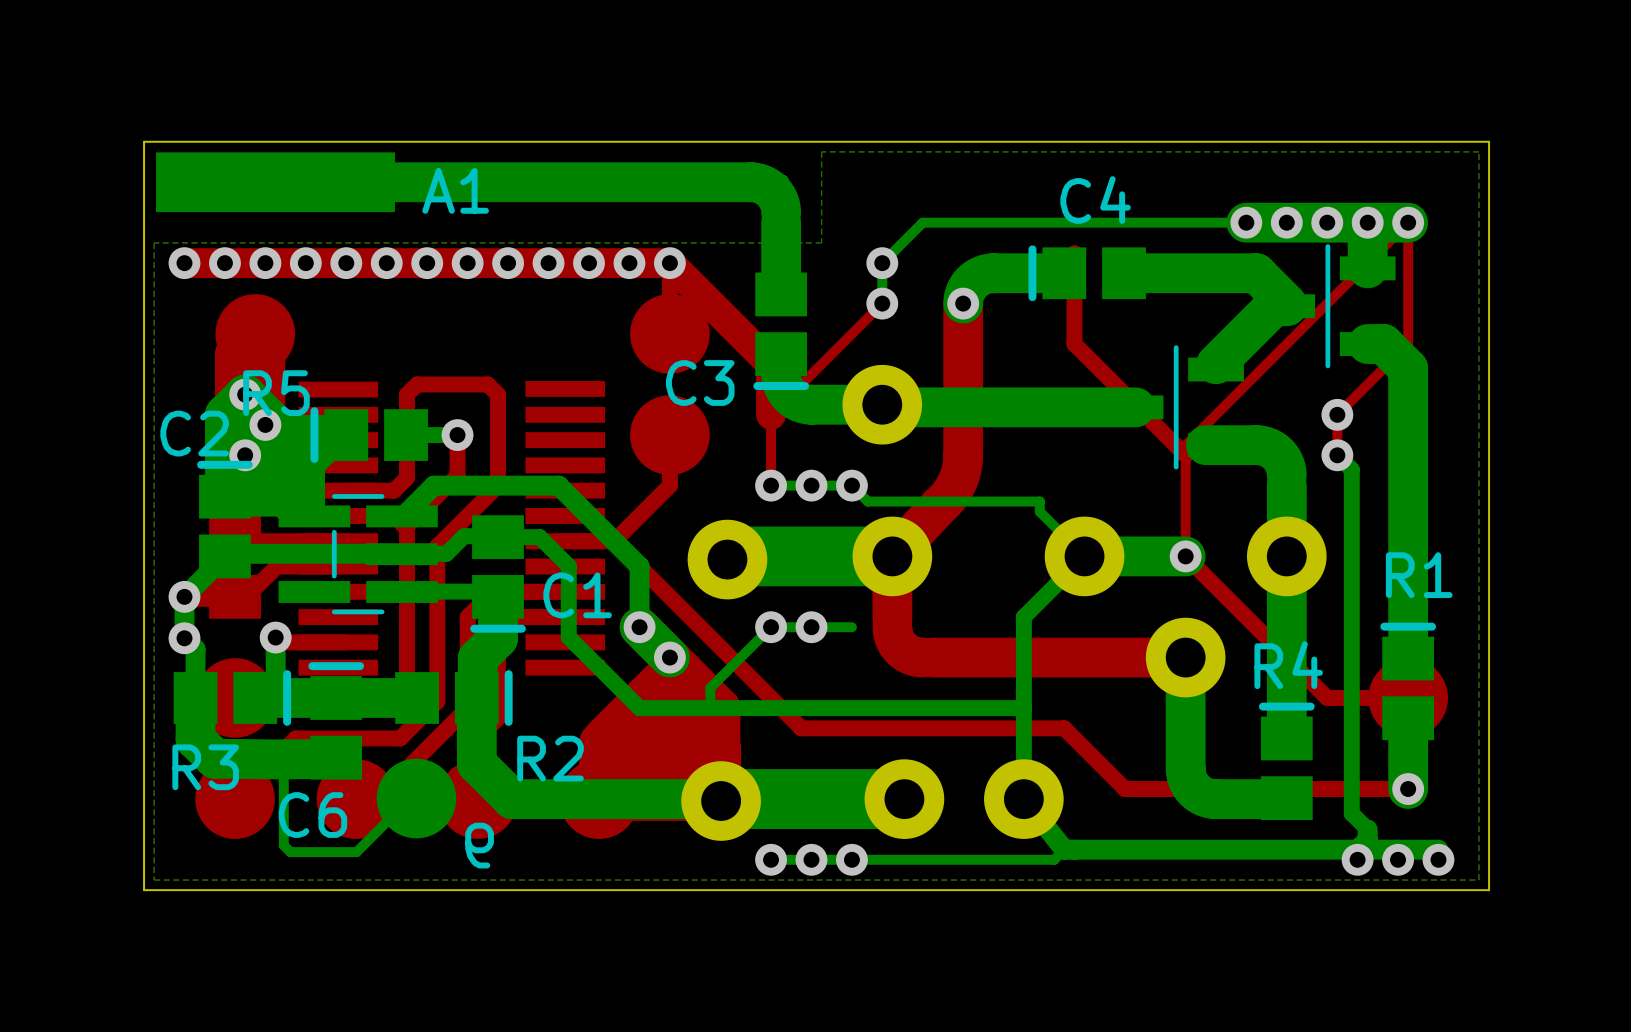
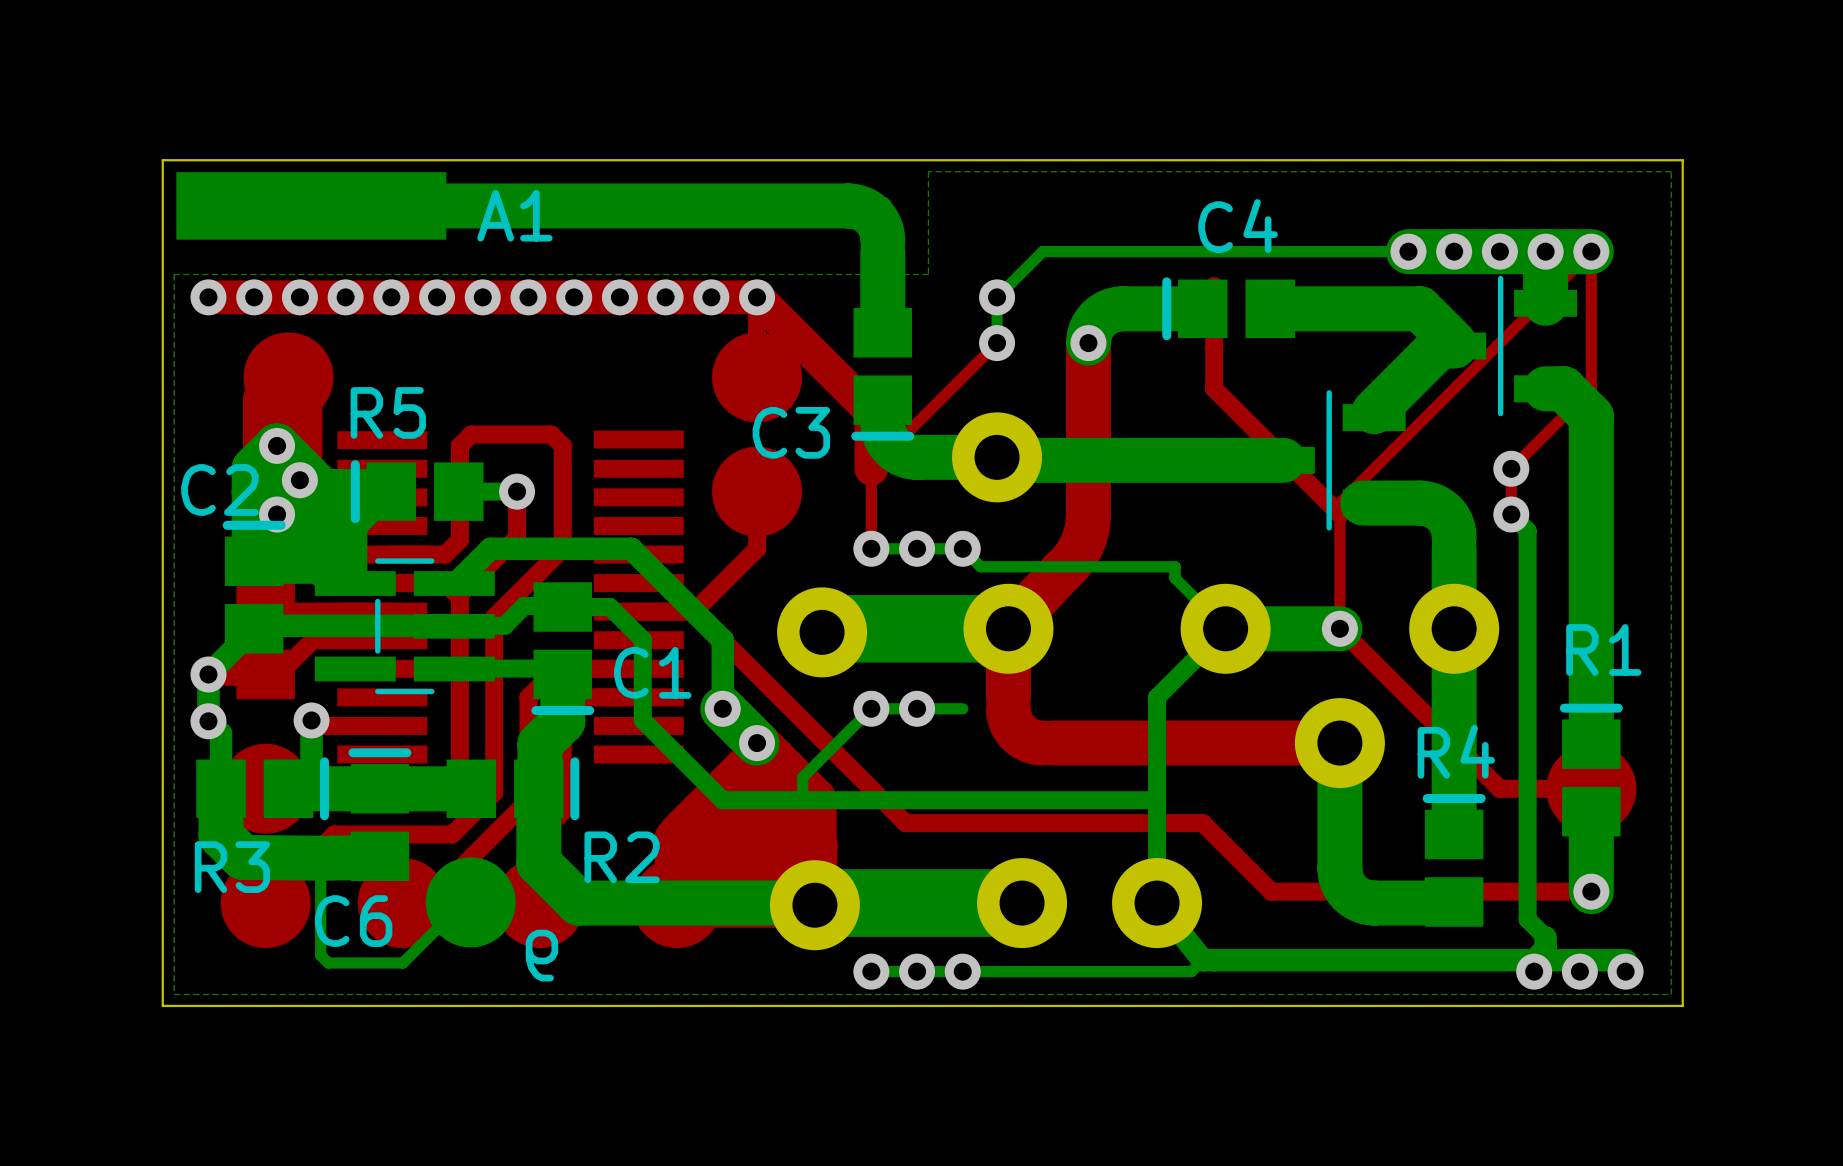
R5 name position: R5 (276, 393) -> R5 (388, 412)

